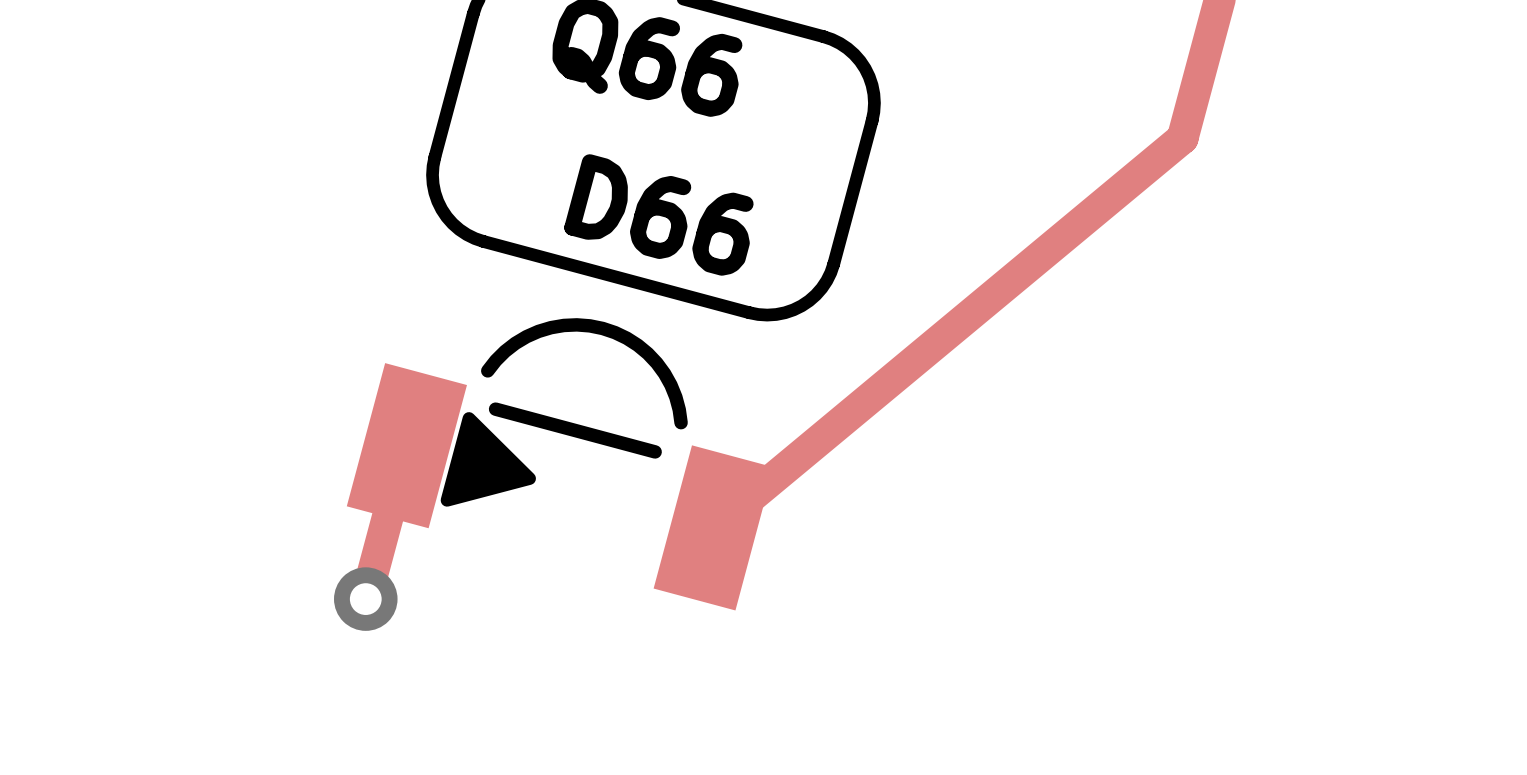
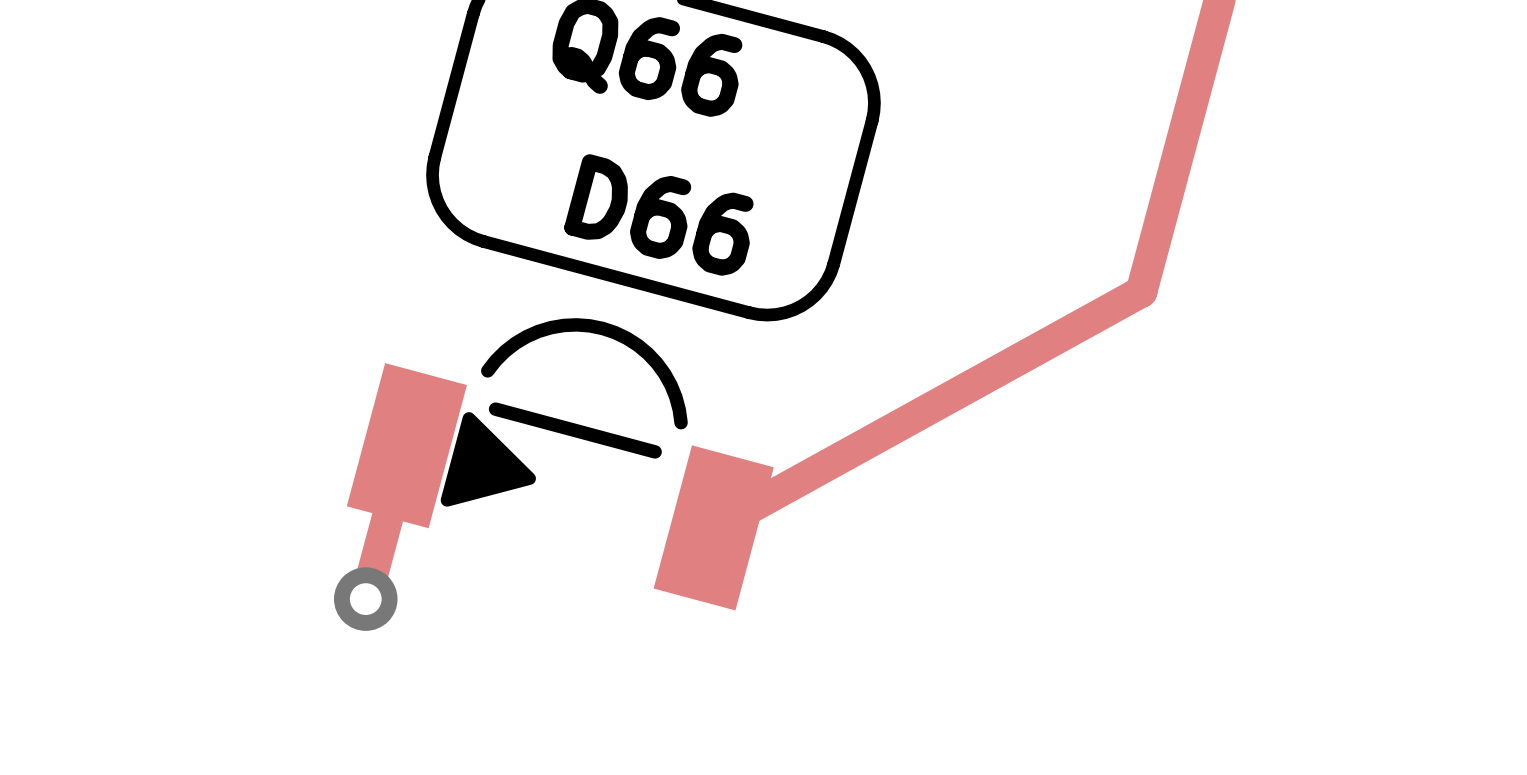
track: (1182, 138) (713, 527) -> (1182, 138) (1141, 291) (713, 527)

